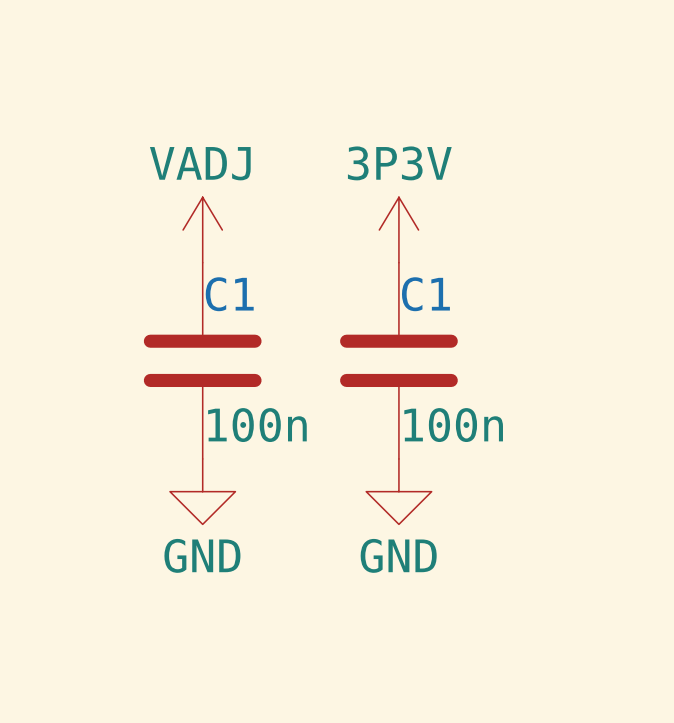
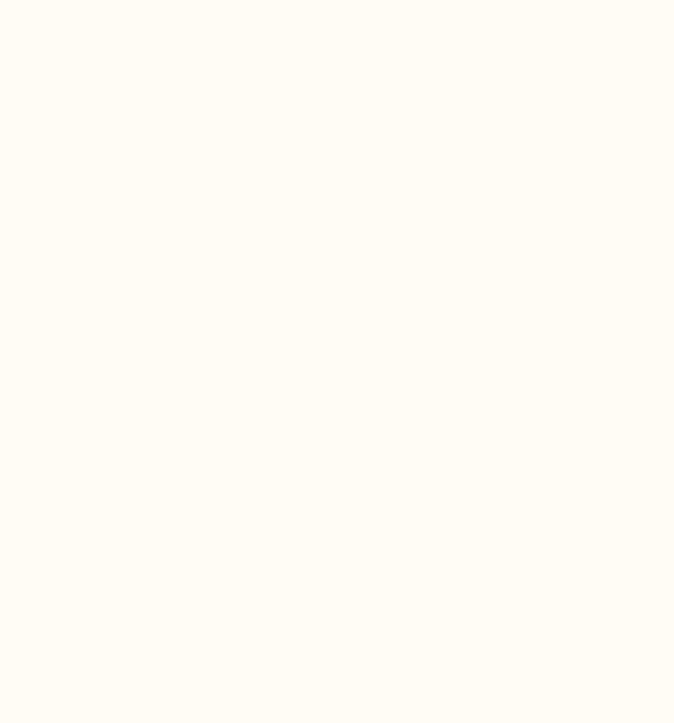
power symbol: VADJ (202, 230) -> none
power symbol: 3P3V (398, 230) -> none
C1: 100n (202, 360) -> none
C1: 100n (398, 360) -> none
power symbol: GND (202, 491) -> none
power symbol: GND (398, 491) -> none

